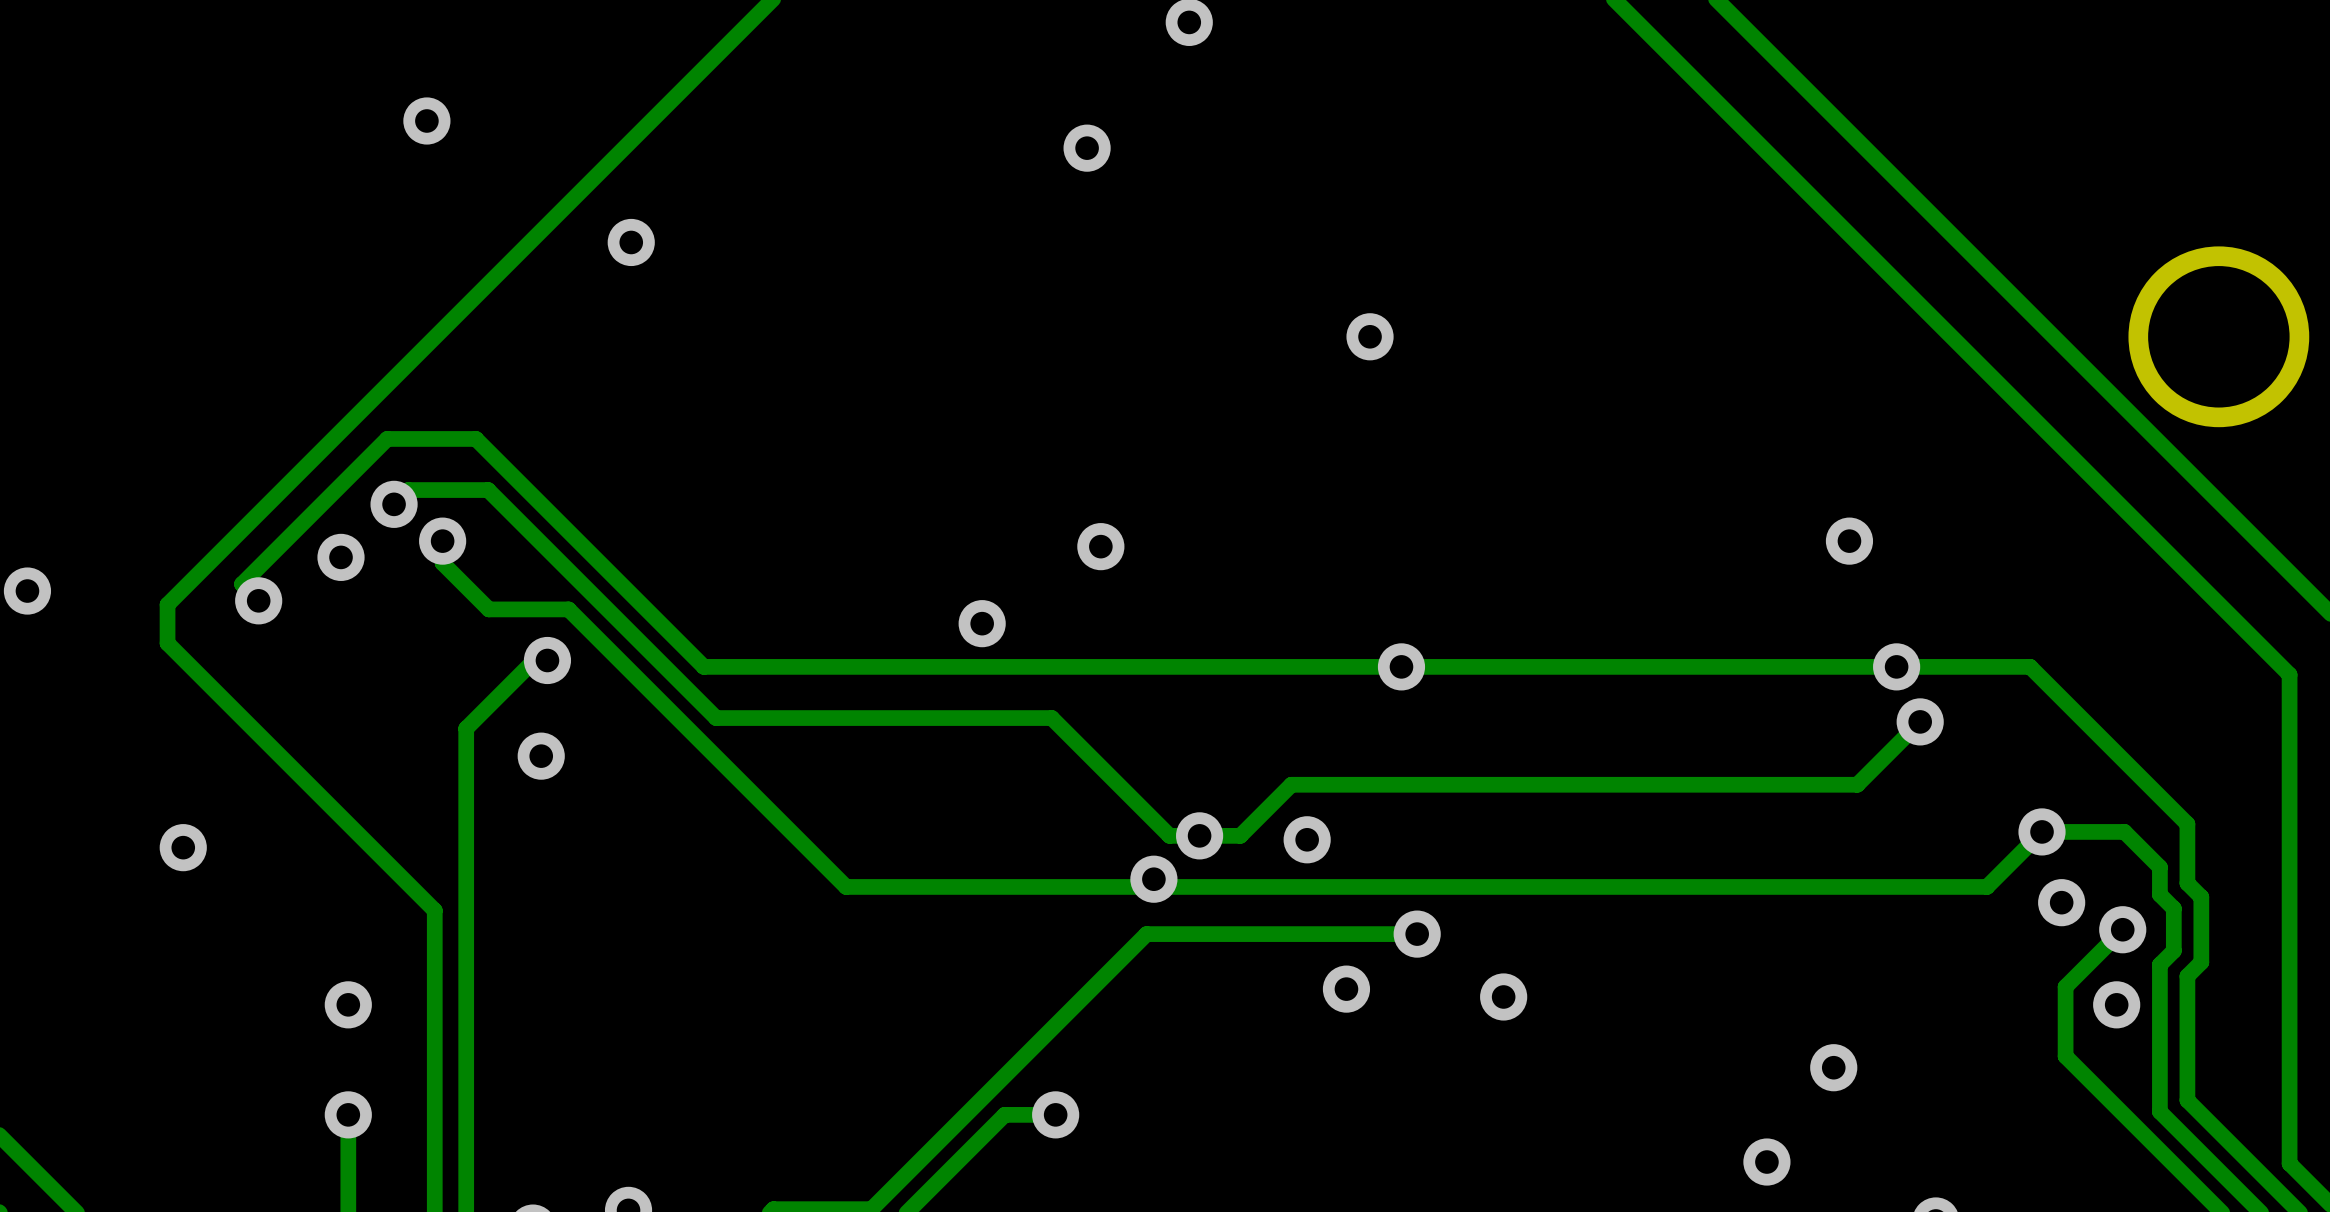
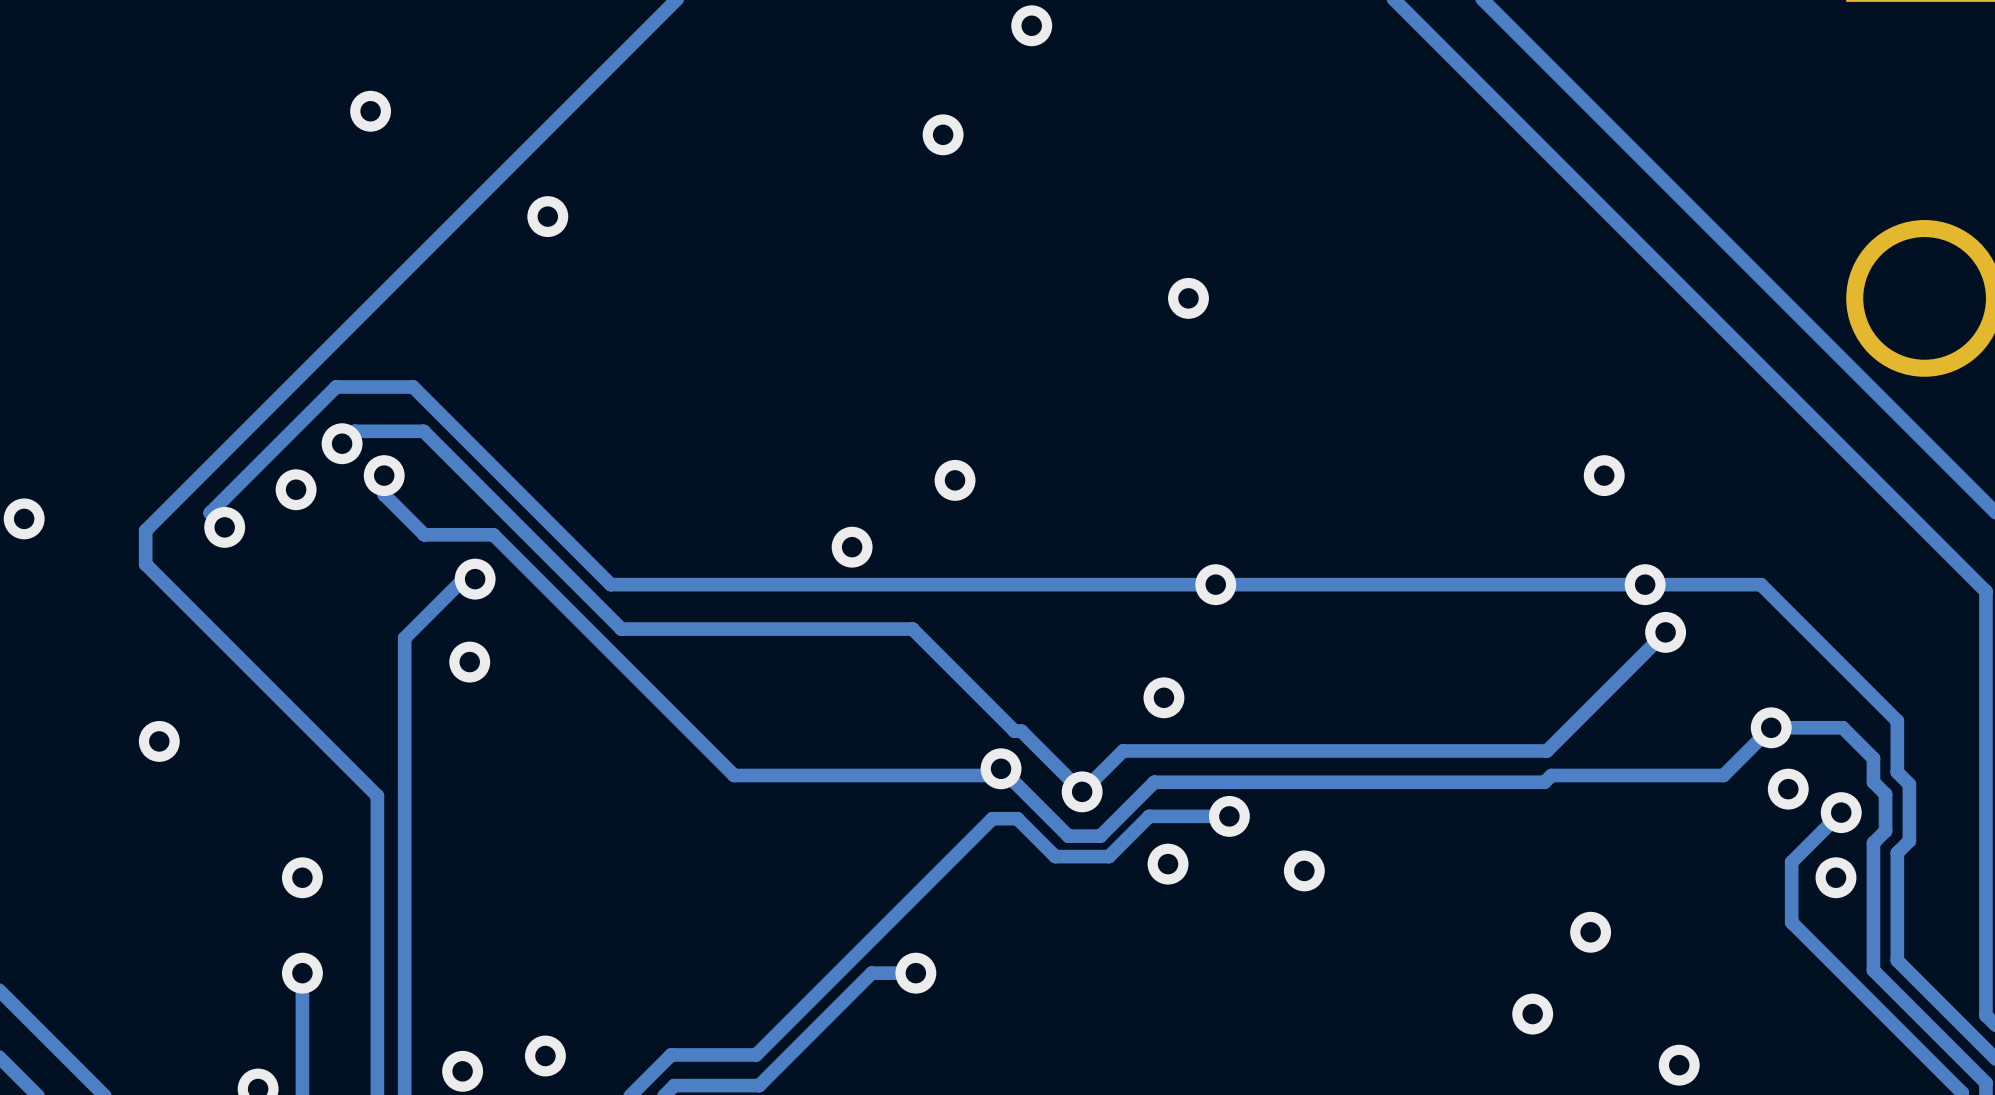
track: (1857, 784) (1291, 784) (1240, 835) (1177, 835) -> (1611, 686) (1547, 750) (1123, 750) (1082, 791) (1021, 731)
via: (1199, 835) -> none
via position: (1307, 839) -> (1163, 697)
track: (1788, 886) (1161, 886) -> (1551, 775) (1544, 782) (1154, 782) (1100, 836) (1068, 836) (1007, 775)
via: none -> (1082, 791)
track: (1324, 934) (1146, 934) (1143, 936) -> (1149, 816) (1108, 856) (1055, 856) (1017, 818) (992, 818)

